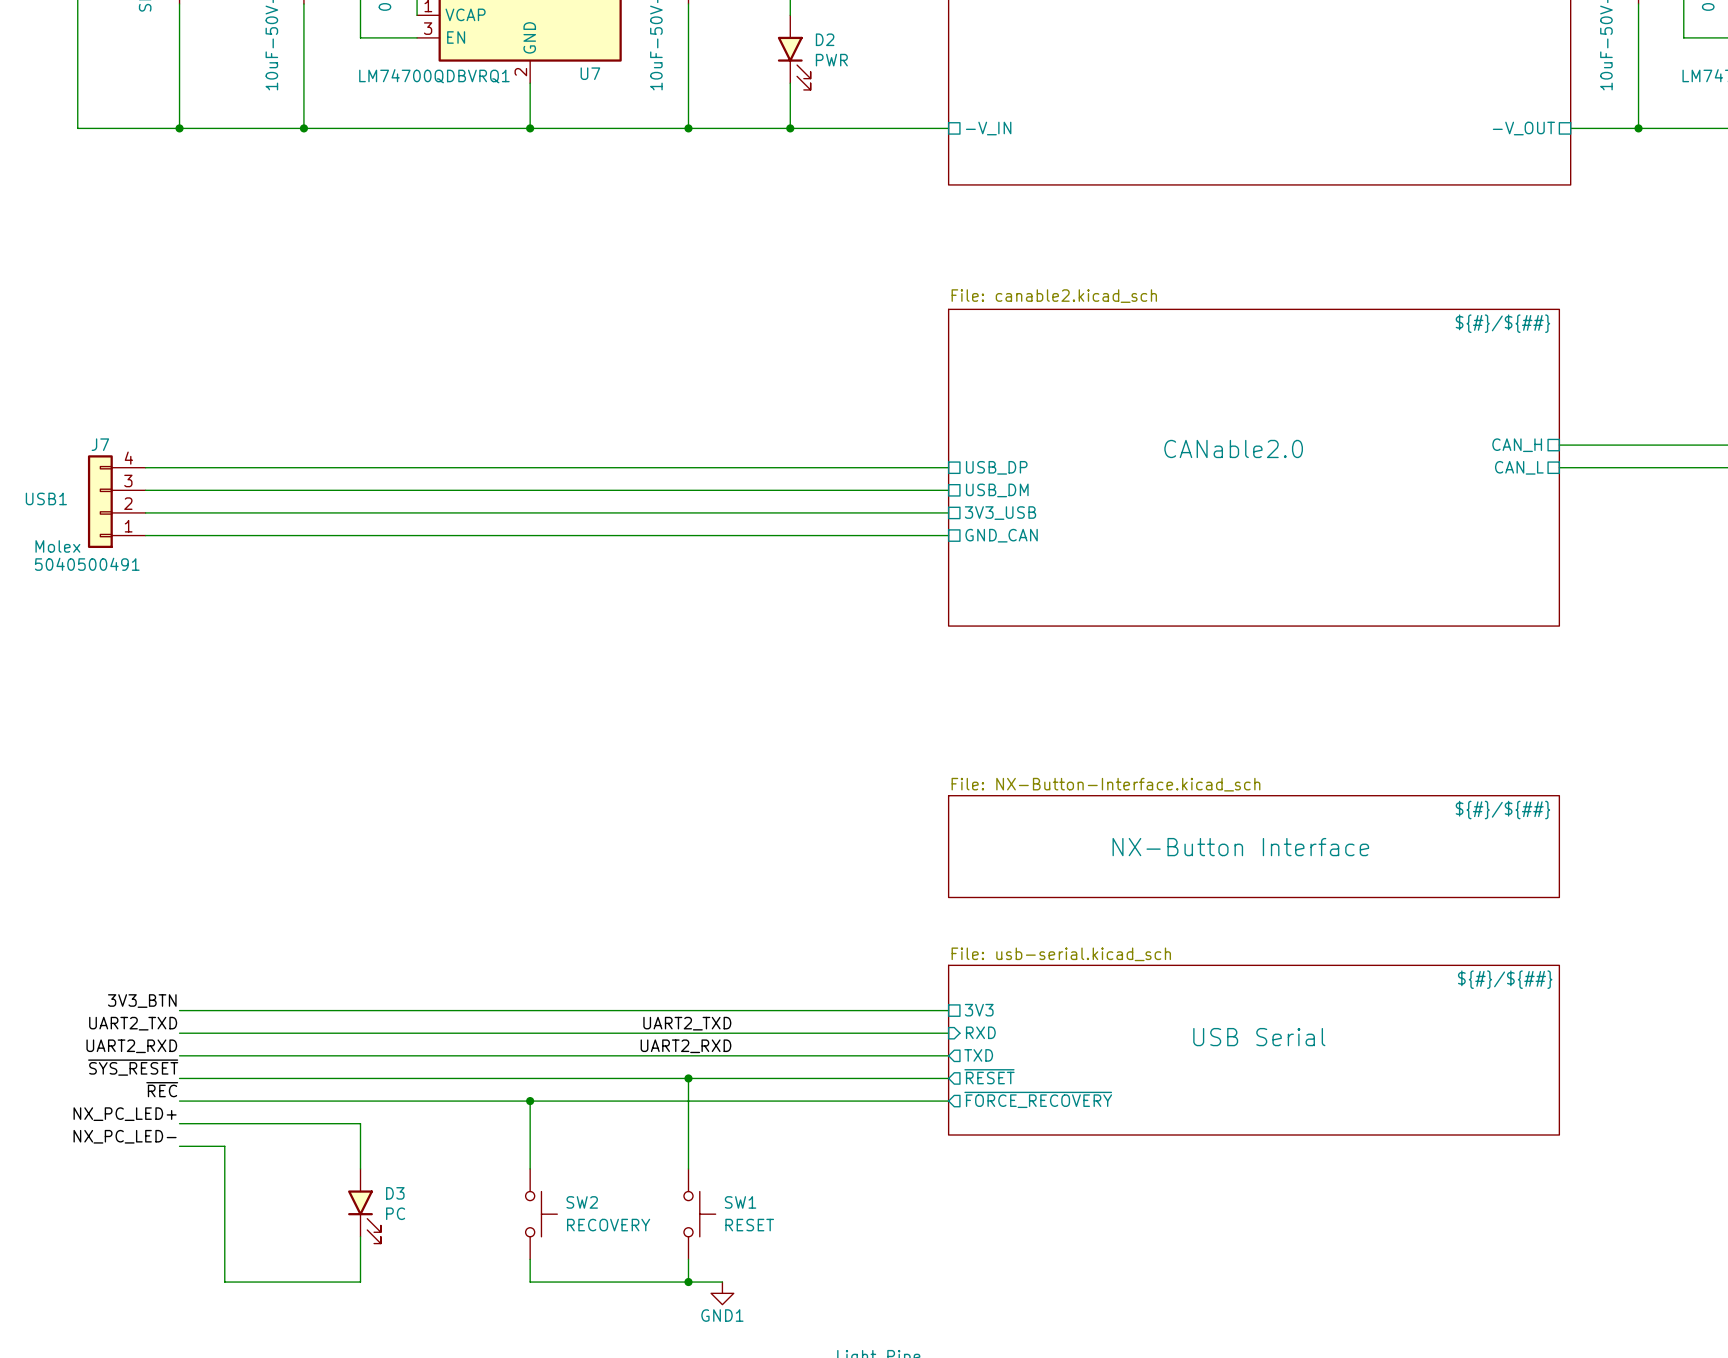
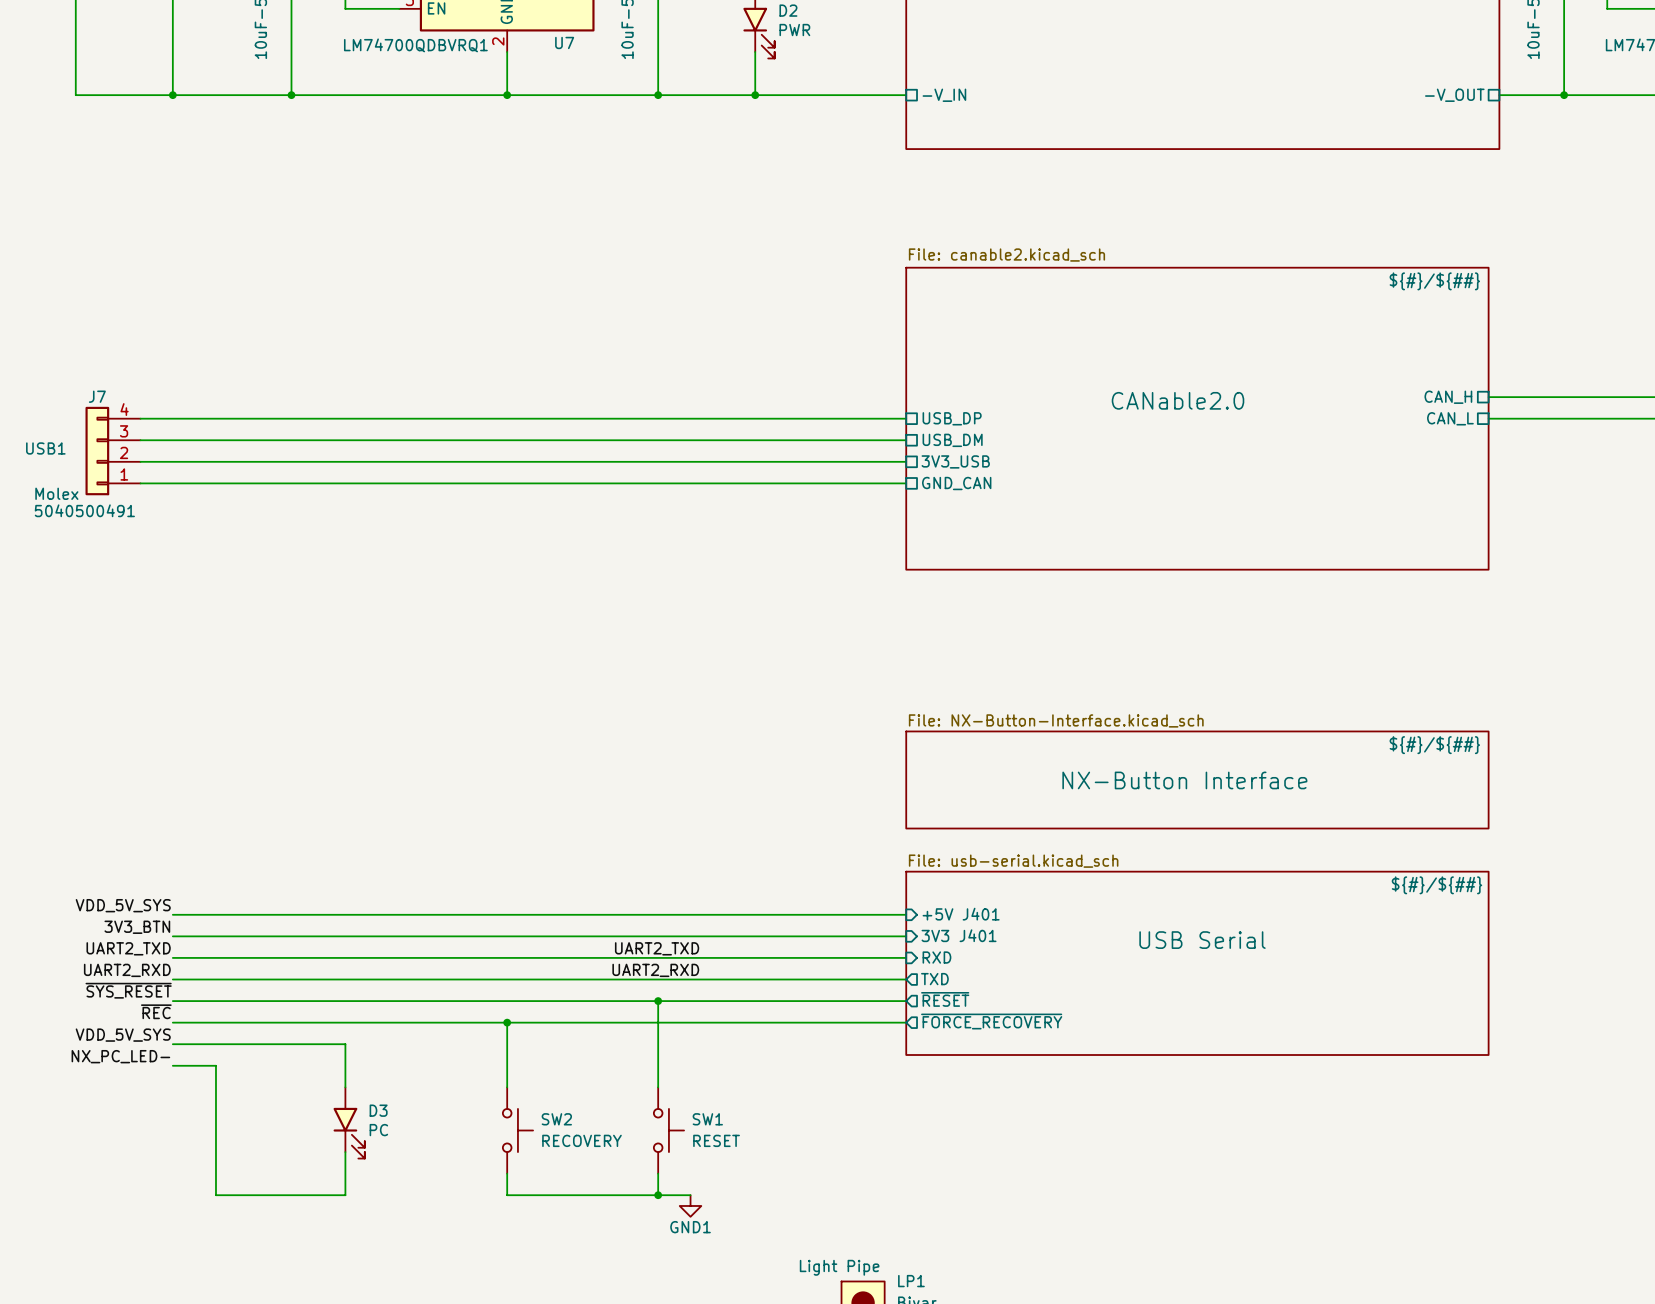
label: none -> VDD_5V_SYS (123, 905)
wire: none -> (172, 914) (906, 914)
sheet pin: none -> +5V J401 (961, 914)
sheet pin shape: passive (979, 1010) -> input (959, 935)
sheet pin: 3V3 (979, 1010) -> 3V3 J401 (959, 935)
sheet USB Serial: none -> File: usb-serial.kicad_sch (1197, 963)
sheet USB Serial: File: usb-serial.kicad_sch (1253, 1050) -> none
label: NX_PC_LED+ (125, 1114) -> VDD_5V_SYS (123, 1035)

